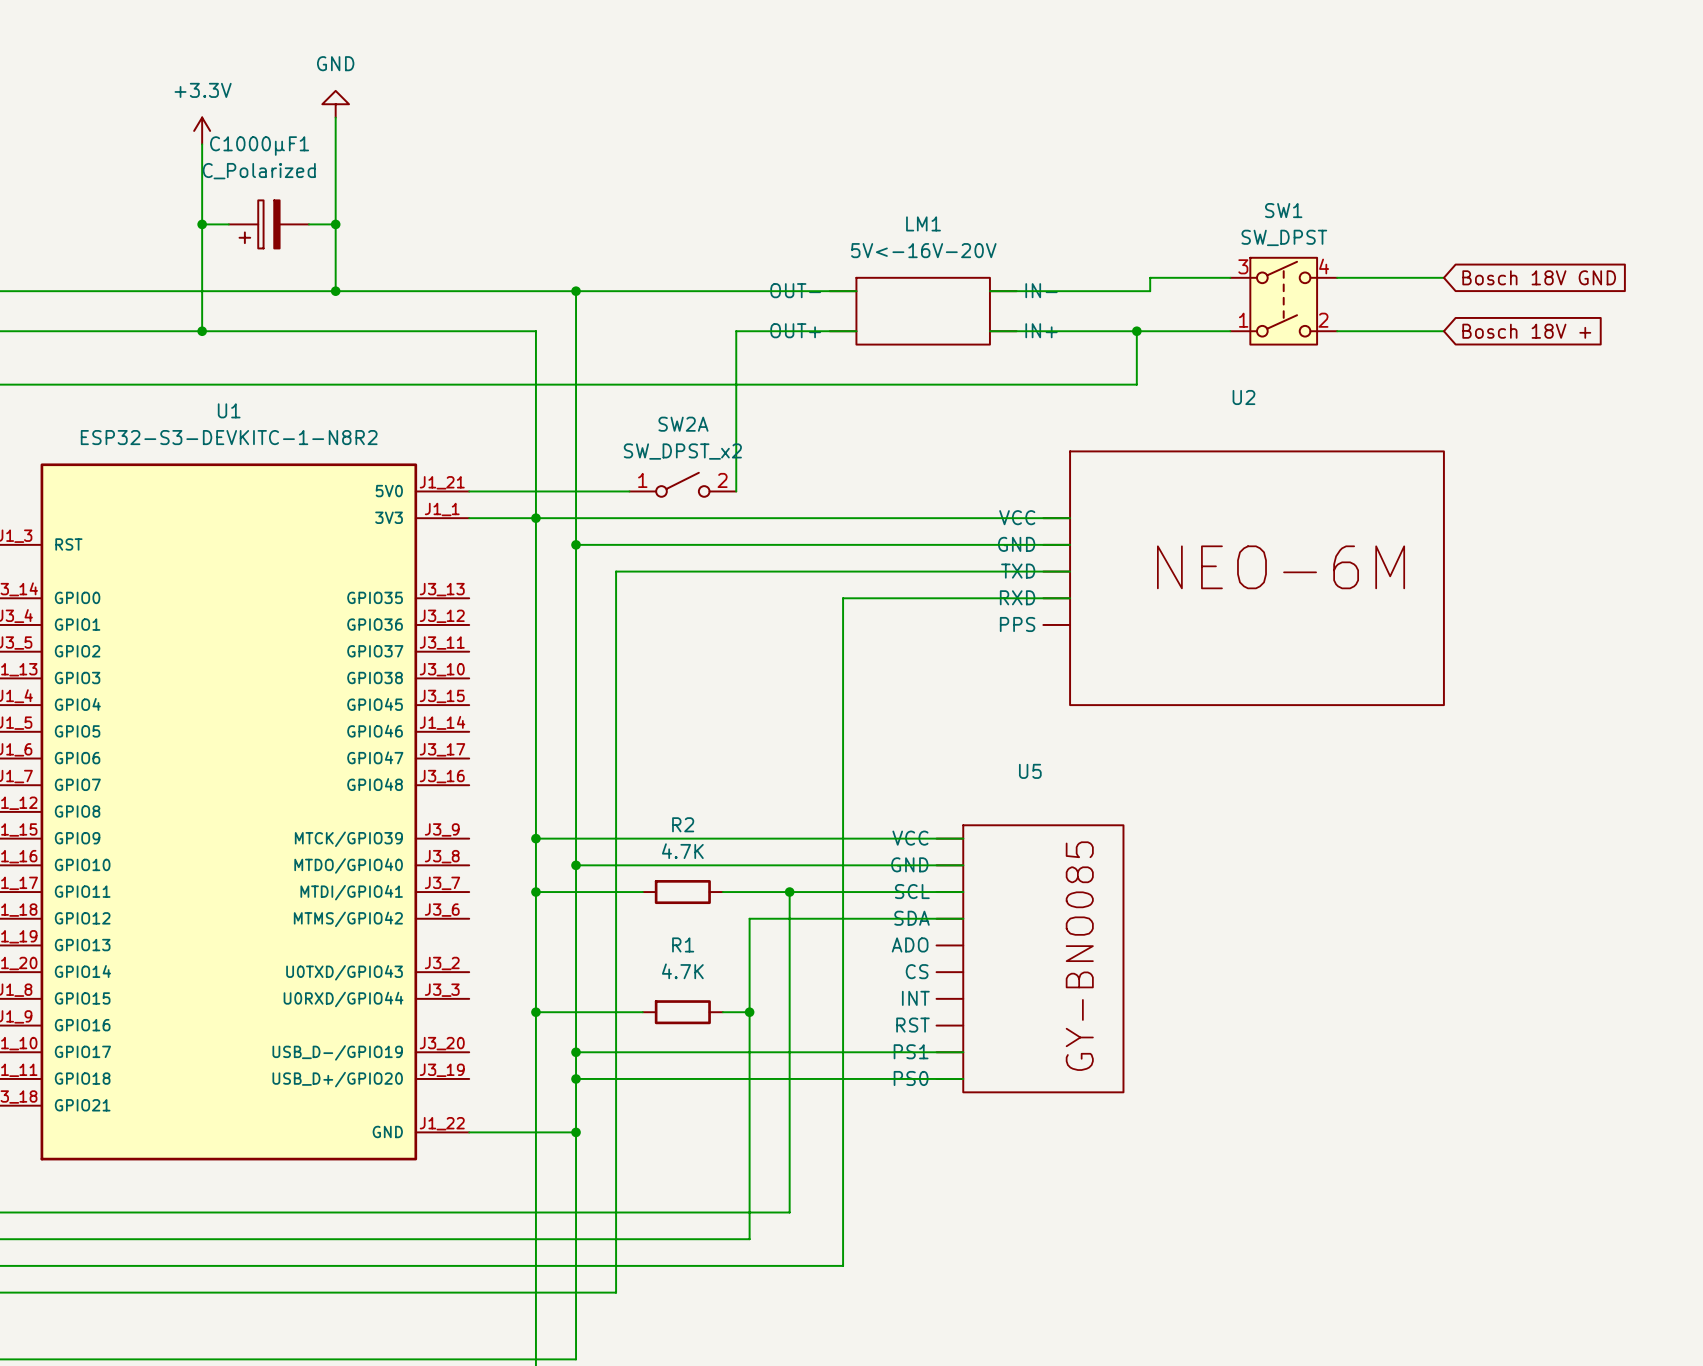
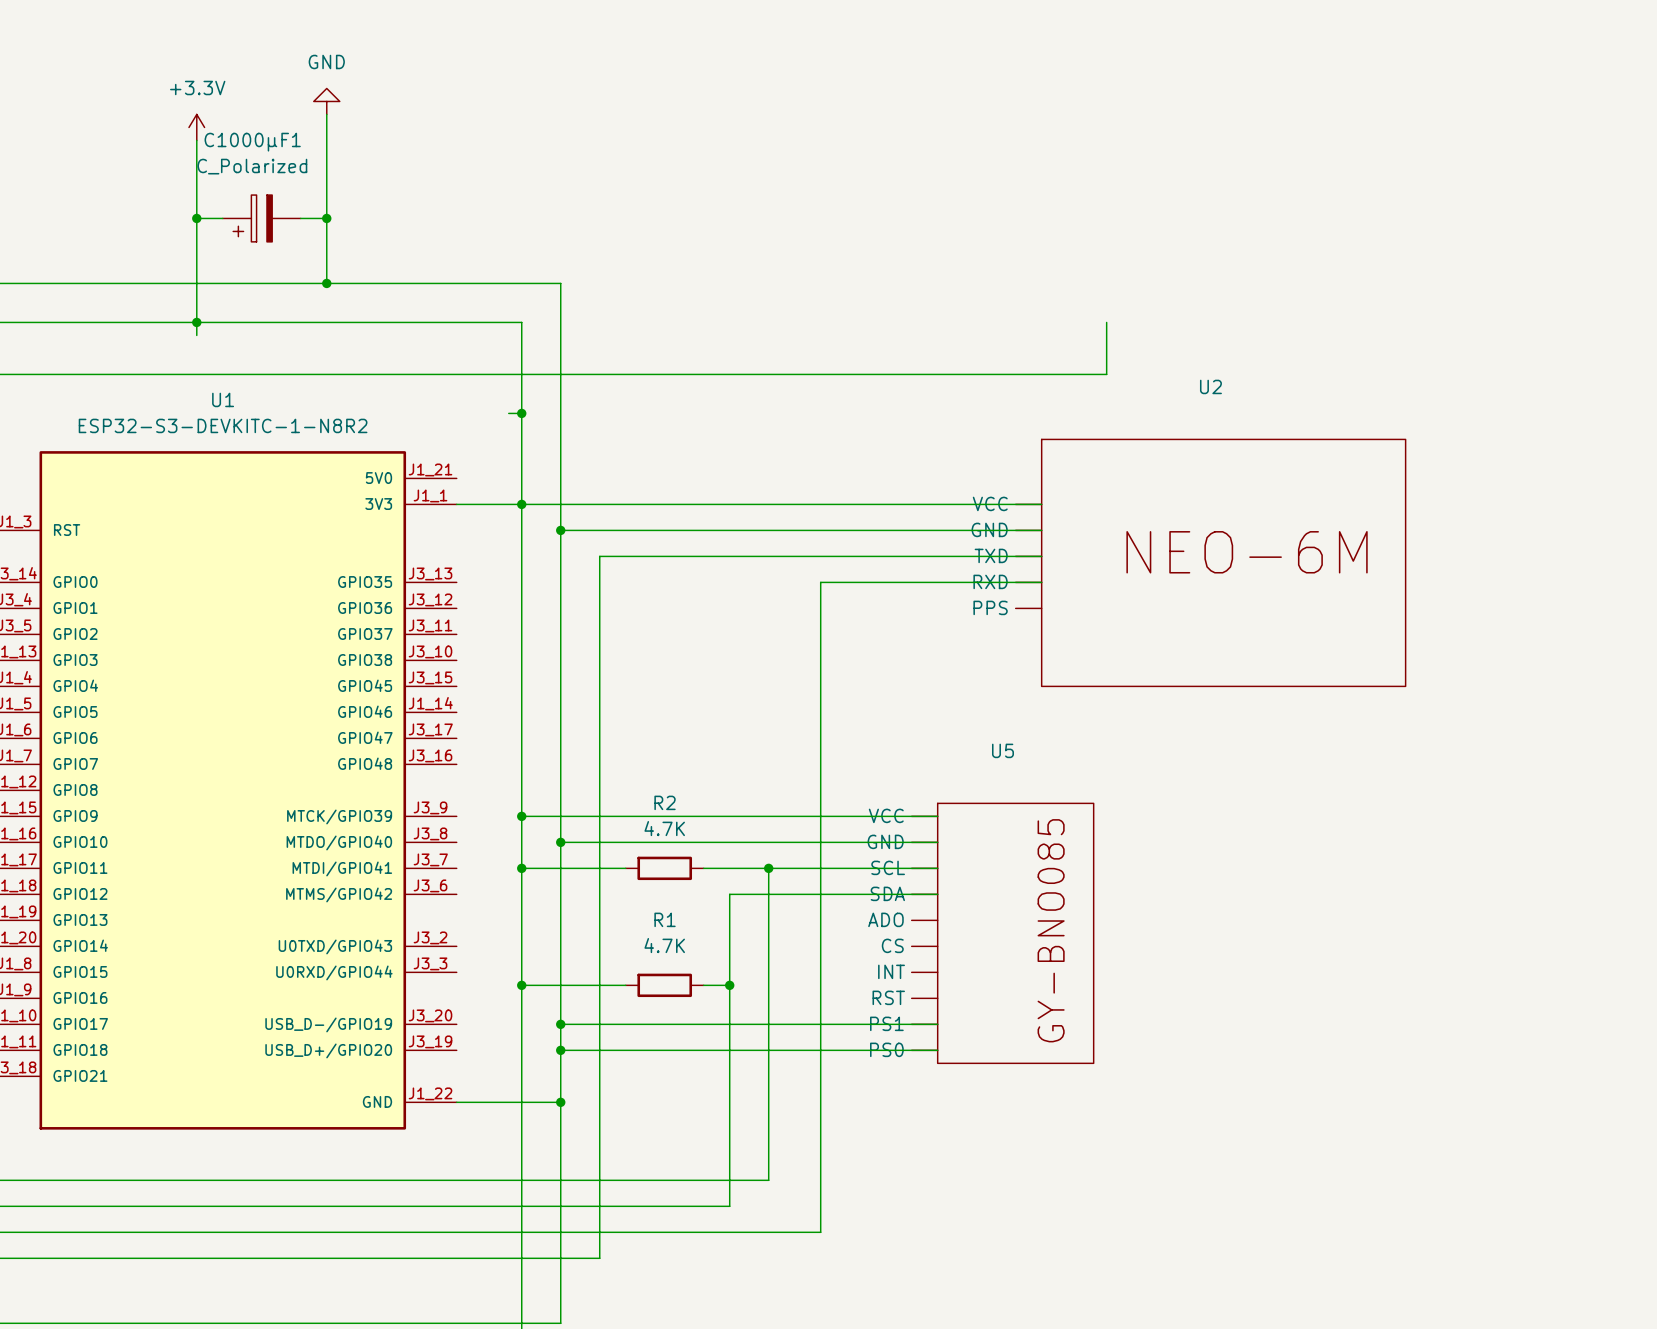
wire: (1230, 277) (1150, 277) (1150, 291) (989, 291) -> none
wire: (1337, 277) (1443, 277) -> none
global label: Bosch 18V GND (1539, 277) -> none
wire: (576, 291) (856, 291) -> none
junction: (576, 291) -> none
SW1: SW_DPST (1283, 301) -> none
LM1: 5V<-16V-20V (923, 311) -> none
wire: none -> (196, 322) (196, 335)
wire: (856, 331) (736, 331) (736, 491) -> none
wire: (989, 331) (1230, 331) -> none
junction: (1136, 331) -> none
wire: (1337, 331) (1443, 331) -> none
global label: Bosch 18V + (1526, 331) -> none
wire: none -> (508, 413) (521, 413)
junction: none -> (521, 413)
SW2A: SW_DPST_x2 (682, 484) -> none
wire: (469, 491) (629, 491) -> none

